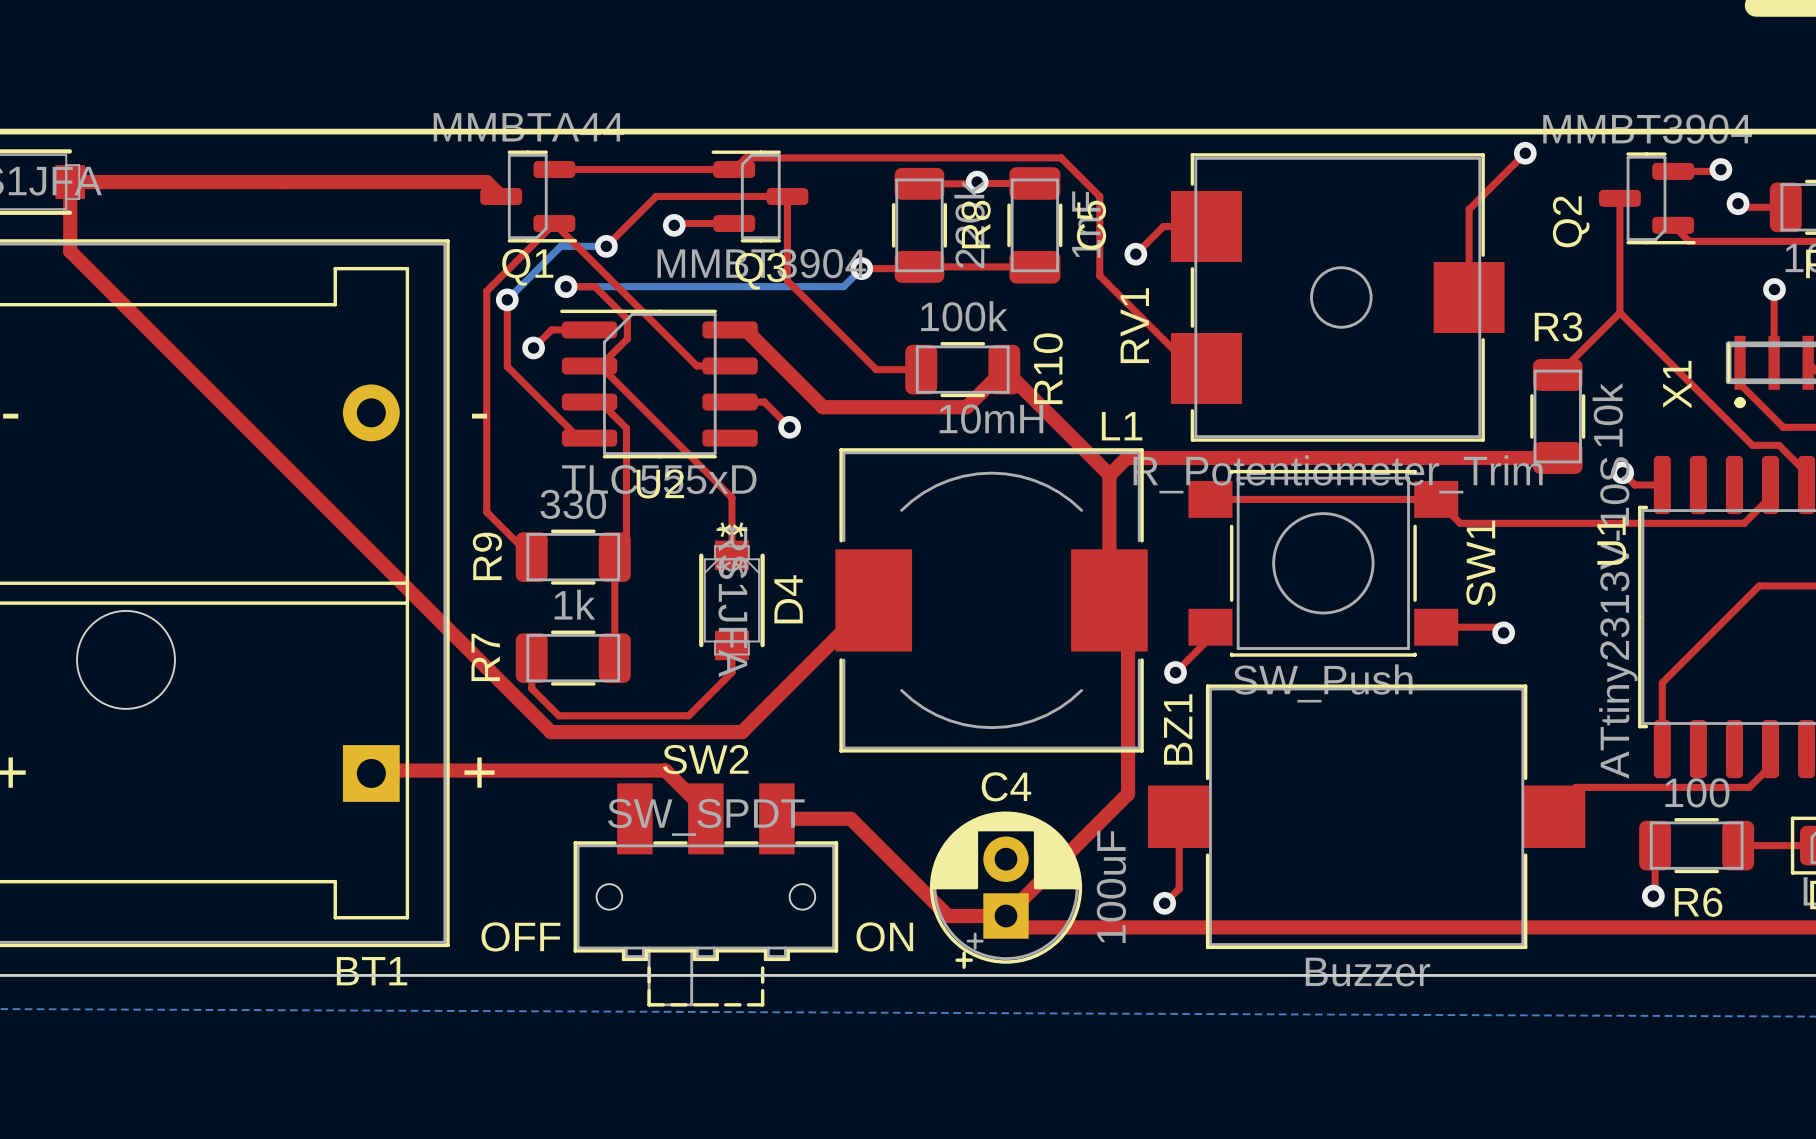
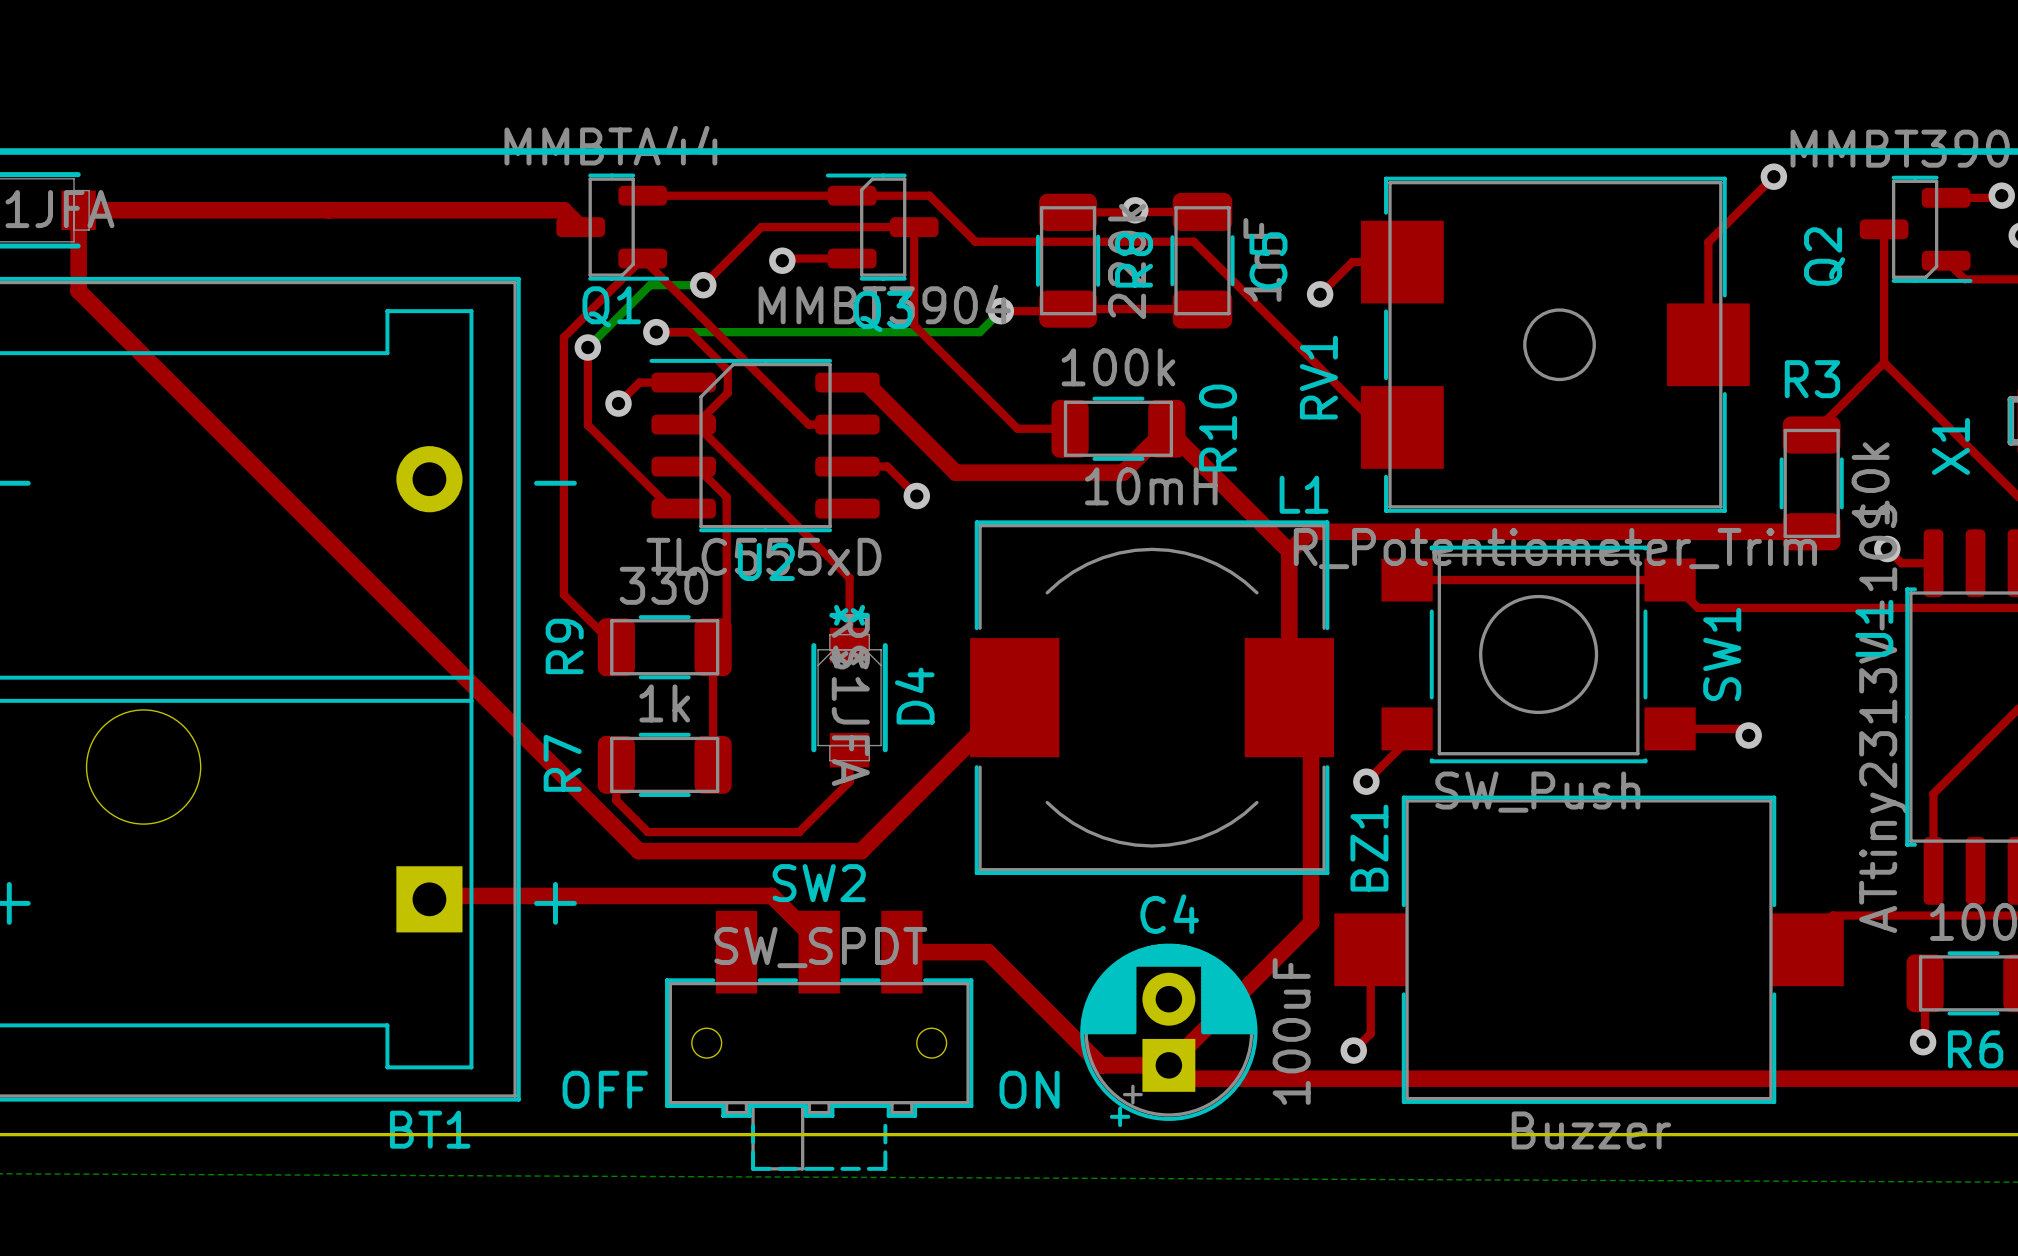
top track: (734, 169) (745, 157) (1061, 157) (1099, 196) (1099, 275) (1192, 368) -> (852, 195) (929, 195) (975, 241) (1193, 241) (1379, 427) (1386, 427)

